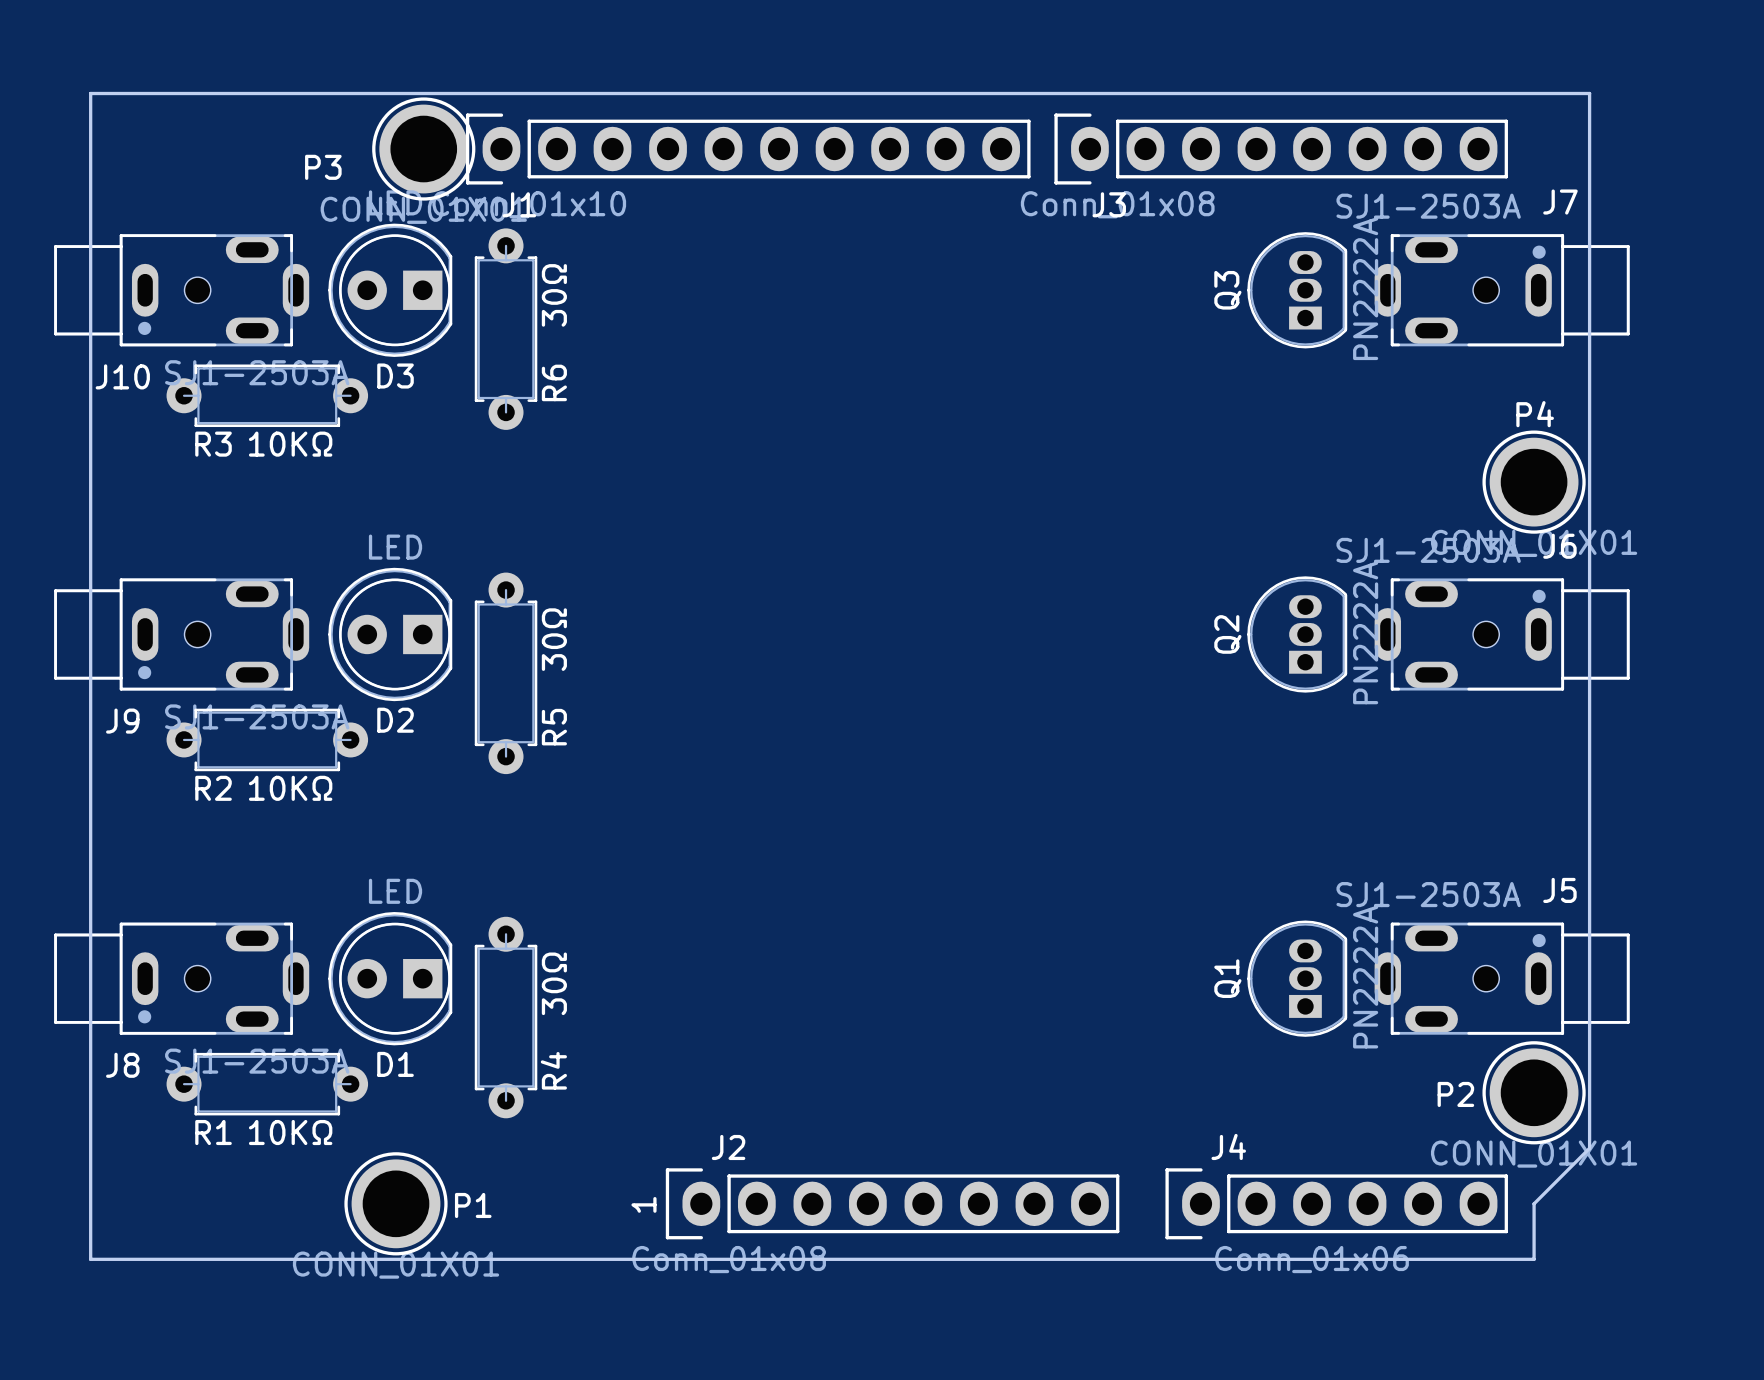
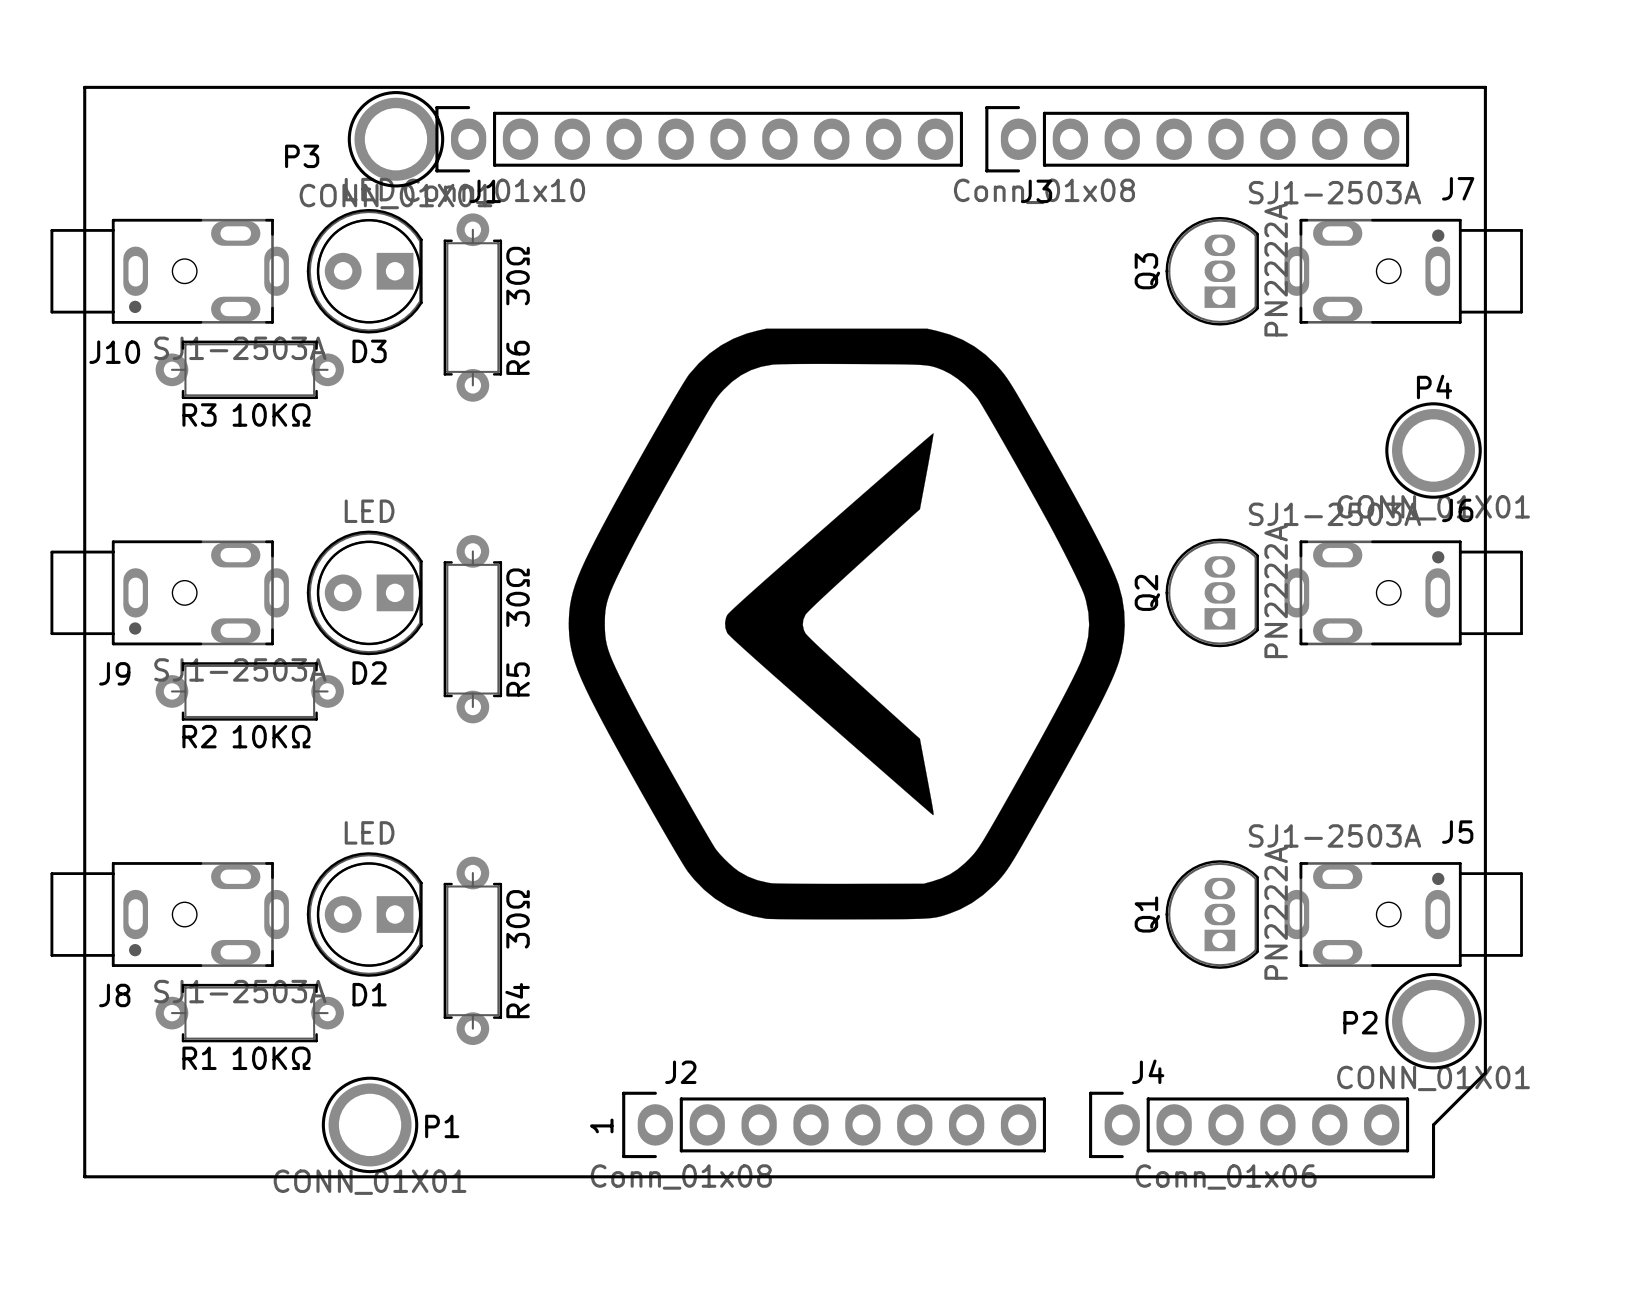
drawing: none -> [568, 328, 1125, 920]

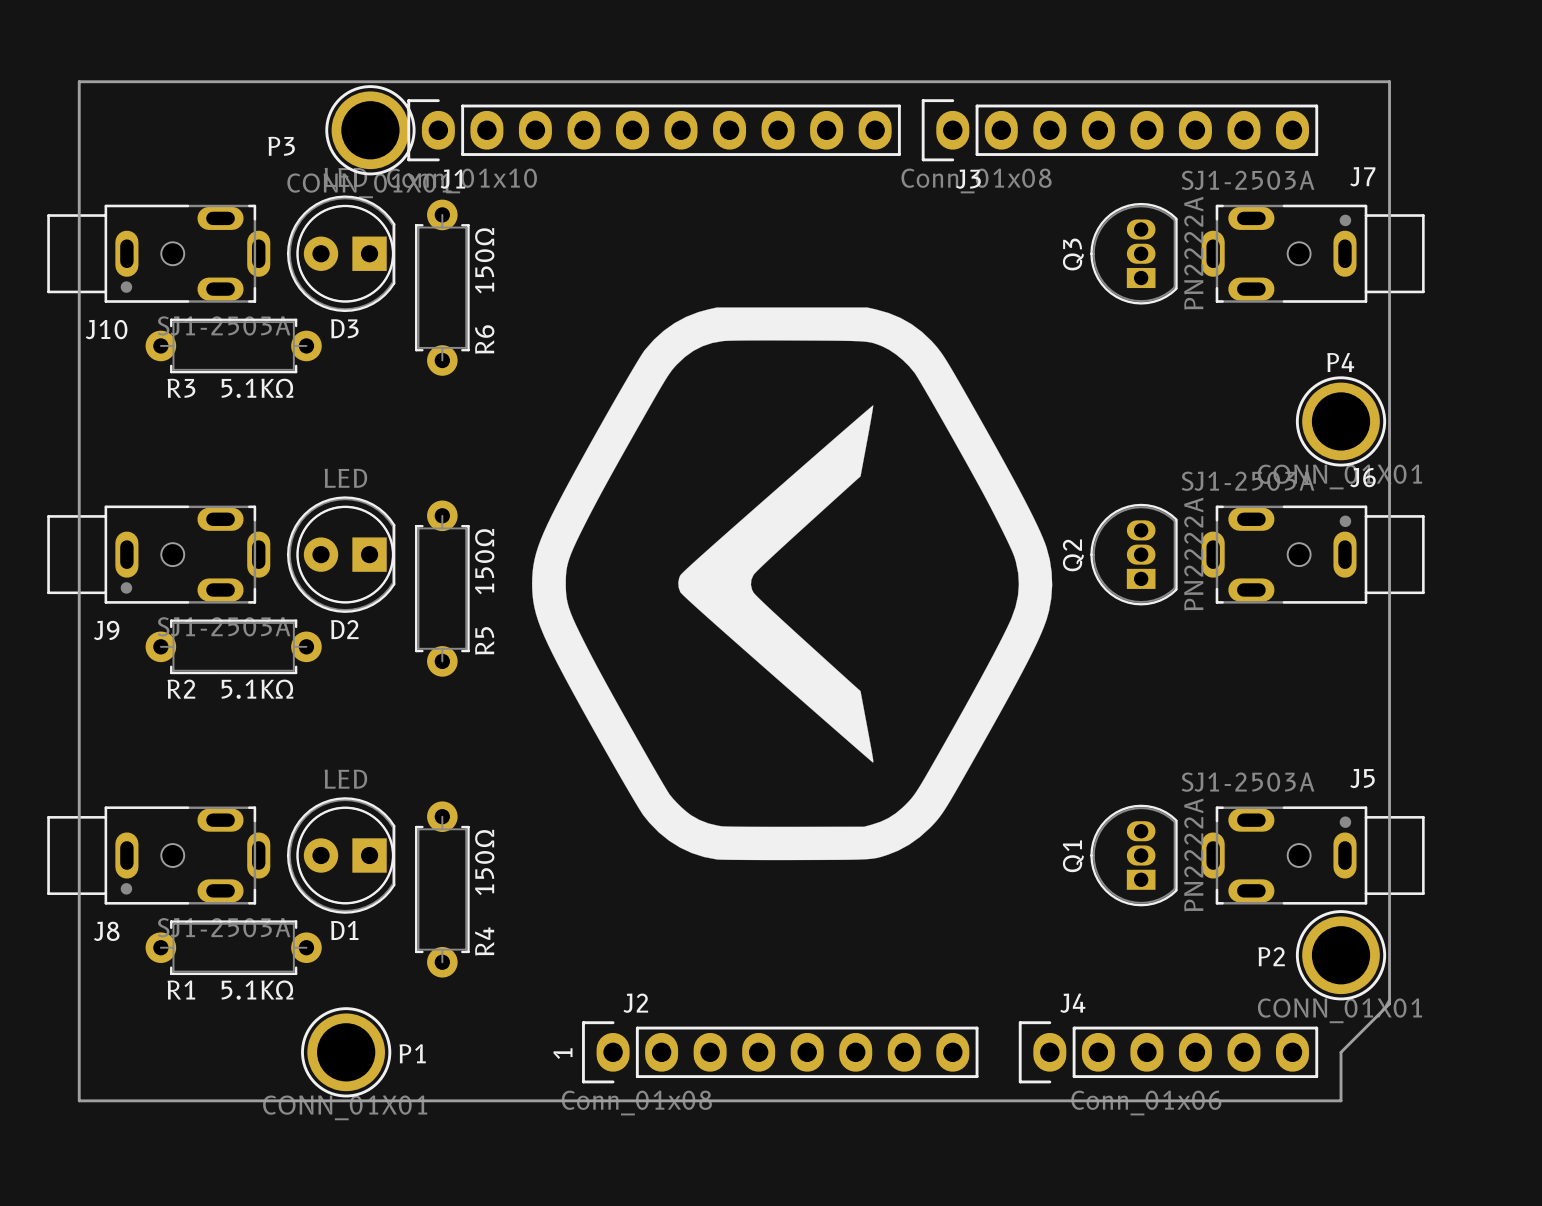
R6 value: 30Ω (518, 276) -> 150Ω (484, 260)
R3 value: 10KΩ (271, 415) -> 5.1KΩ (257, 388)
R5 value: 30Ω (518, 597) -> 150Ω (484, 561)
R2 value: 10KΩ (271, 736) -> 5.1KΩ (257, 689)
R4 value: 30Ω (518, 919) -> 150Ω (484, 862)
R1 value: 10KΩ (271, 1058) -> 5.1KΩ (257, 990)

